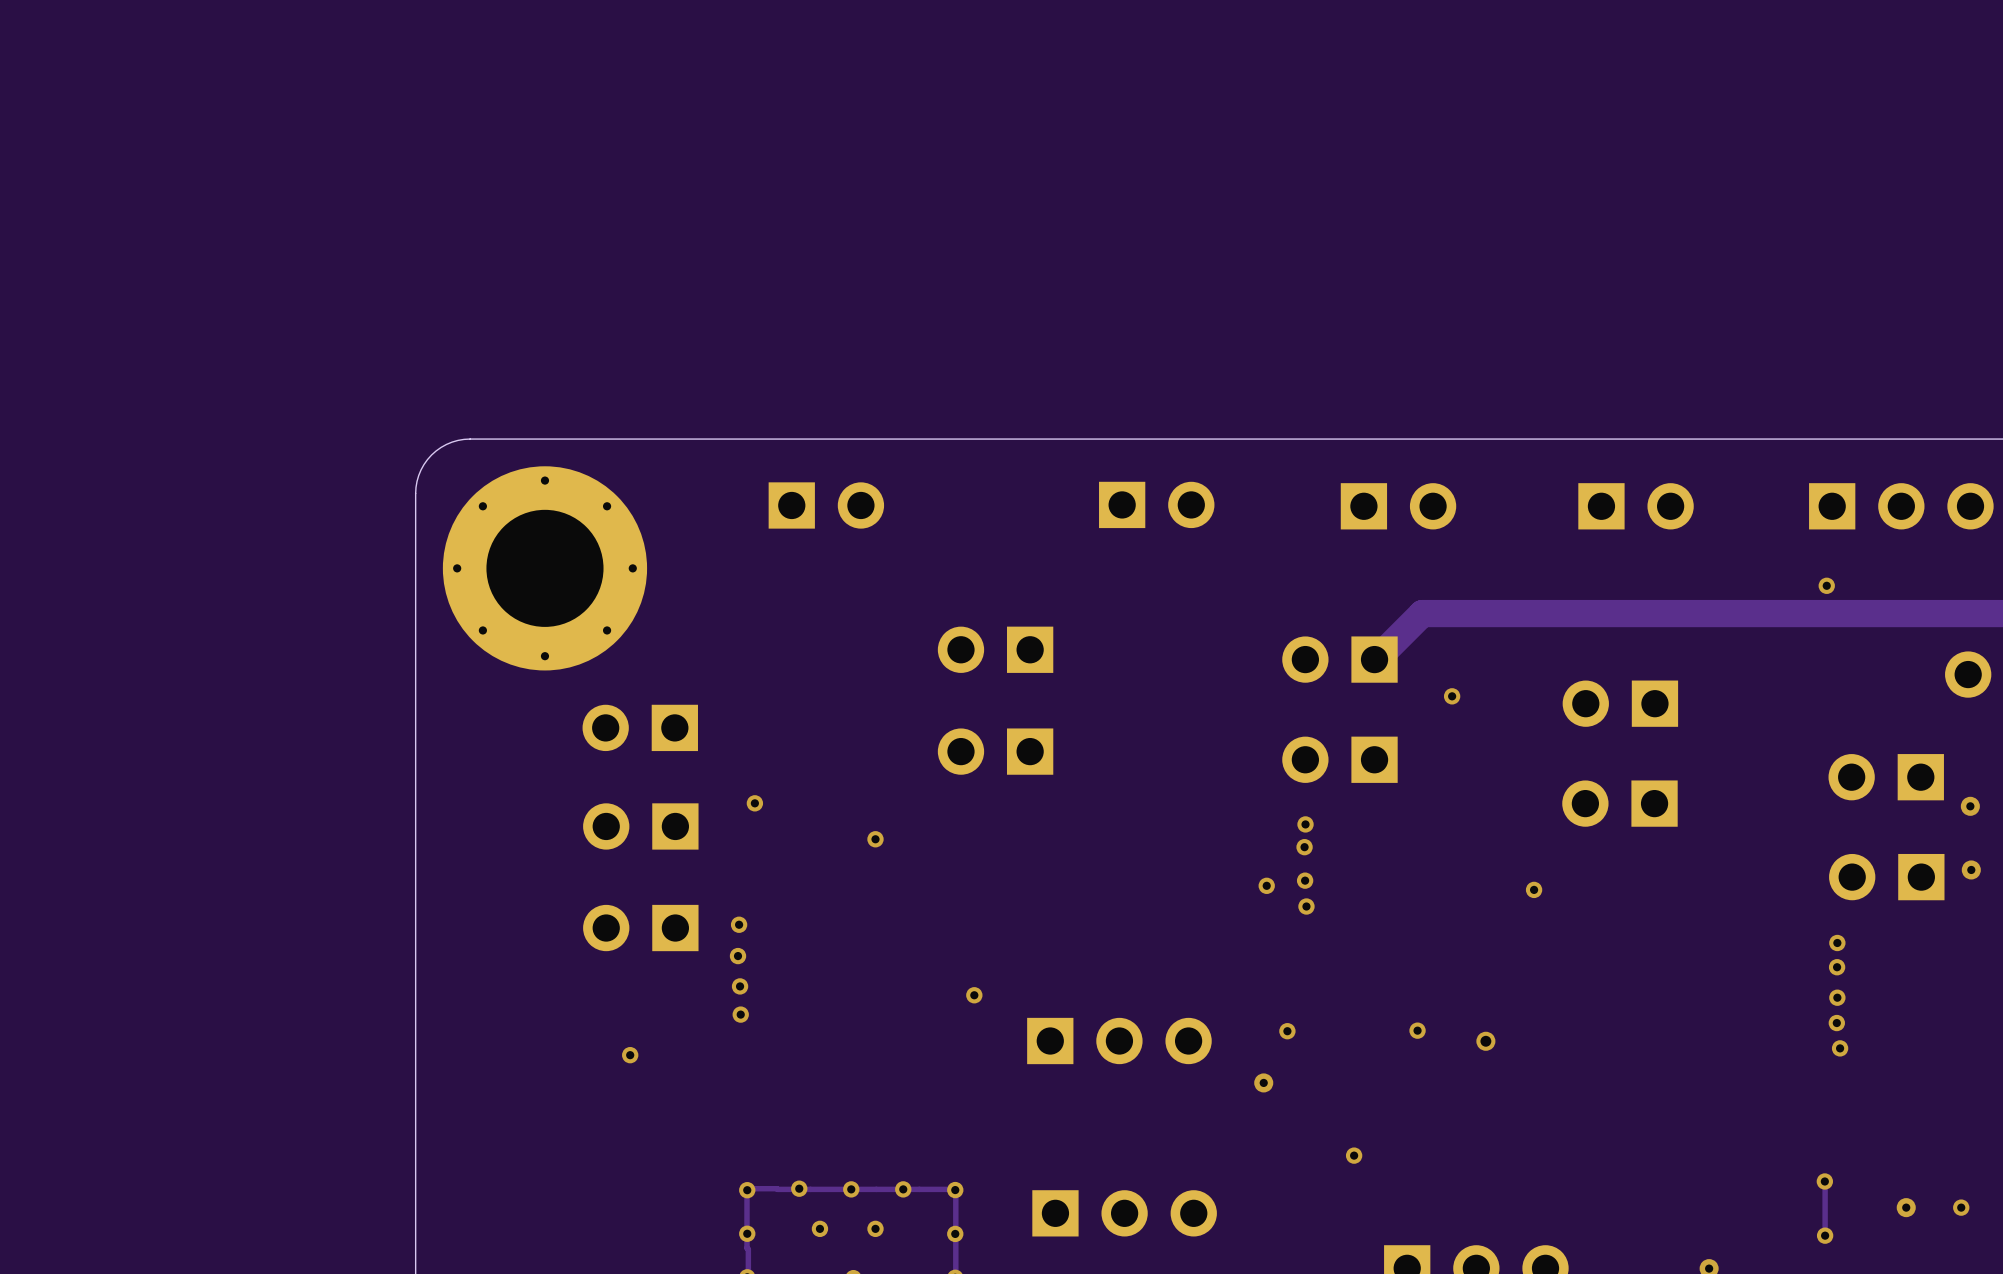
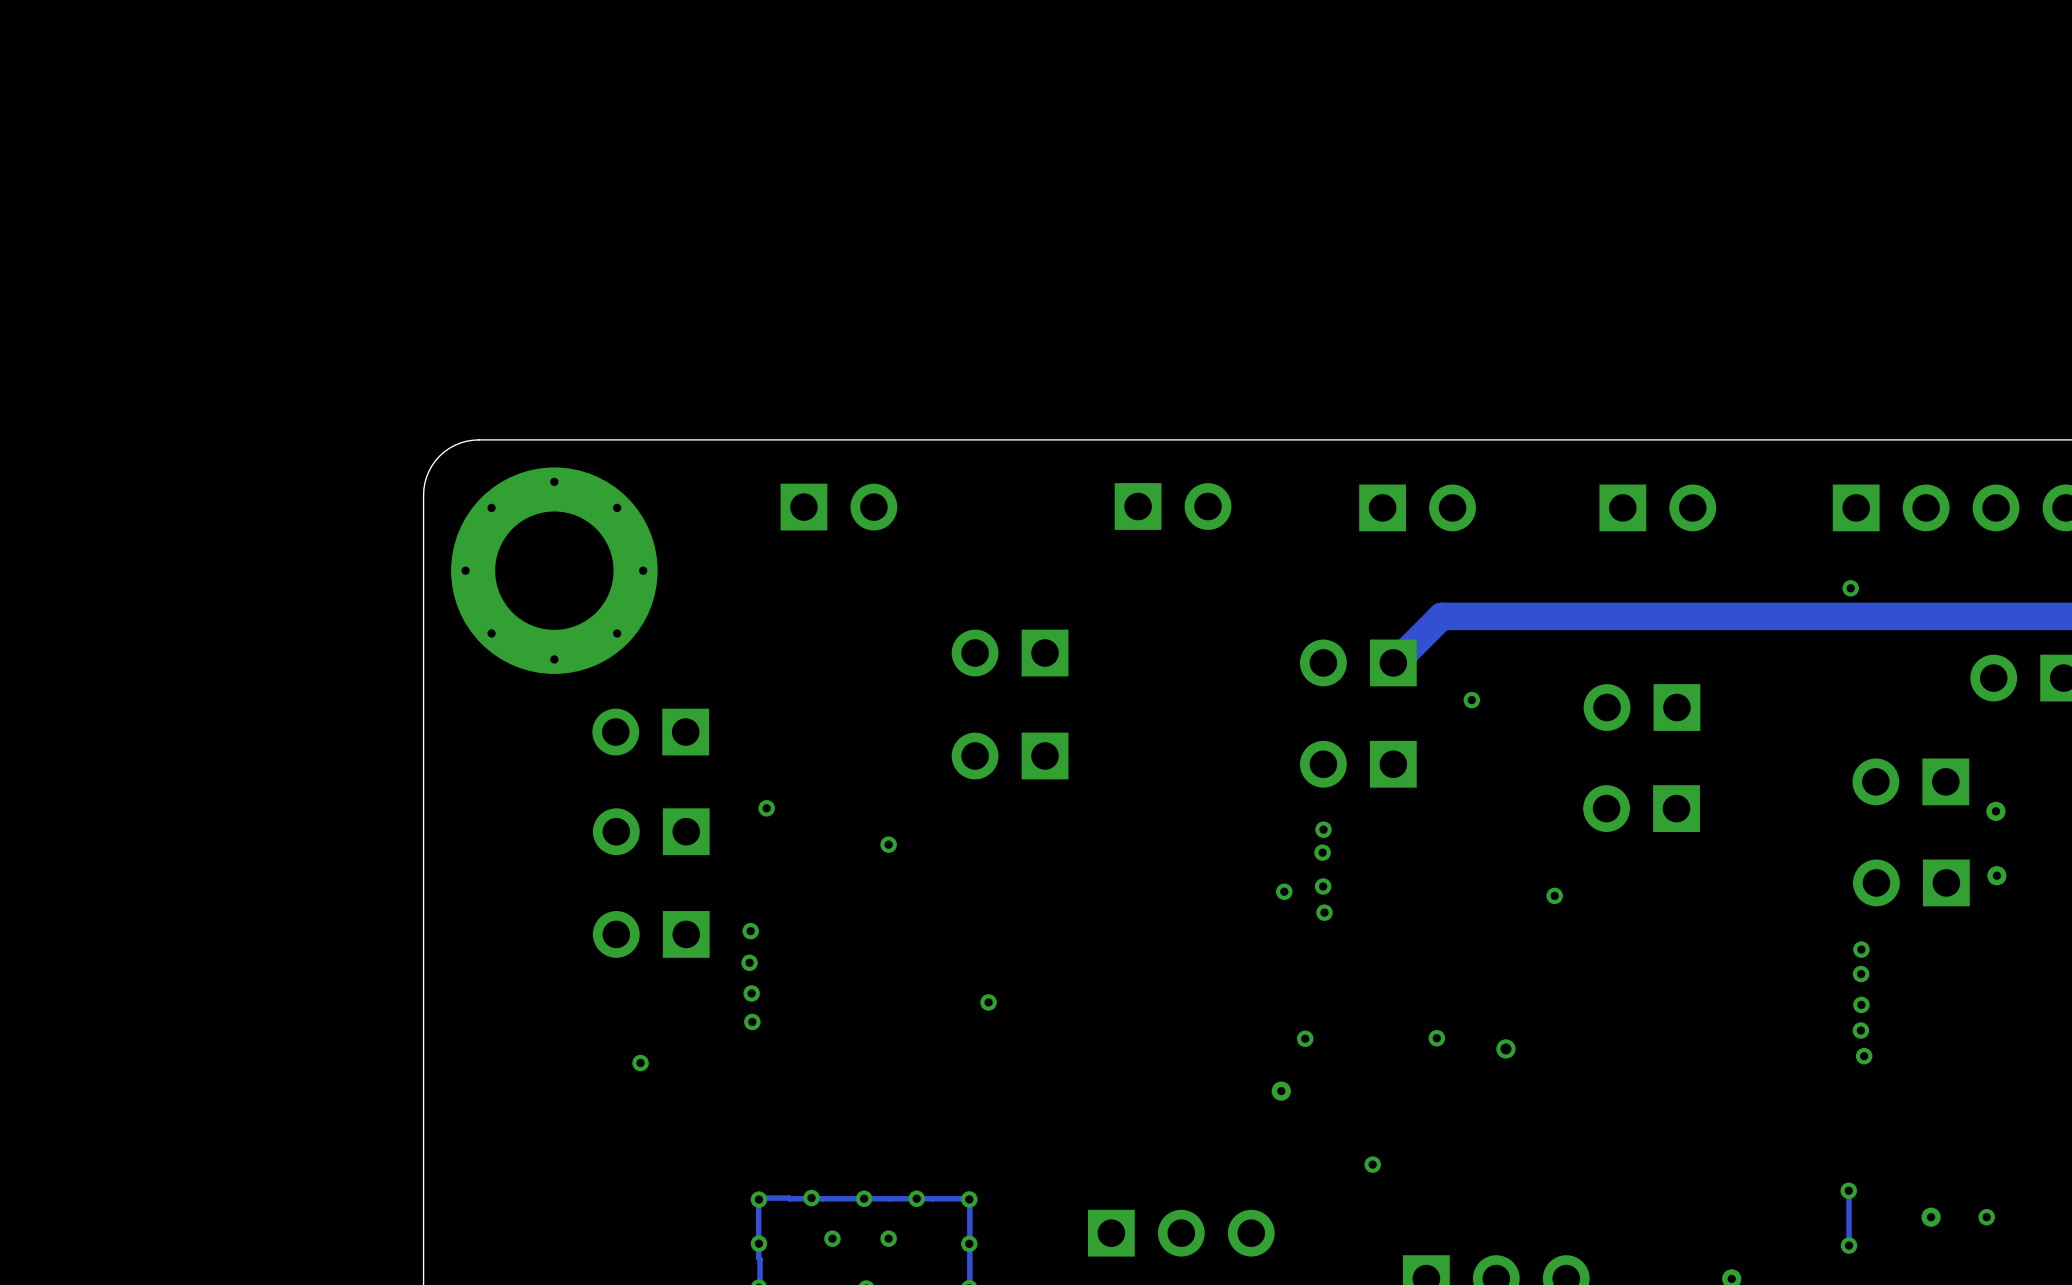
part: (1119, 1041) -> none
part position: (1124, 1213) -> (1181, 1233)

